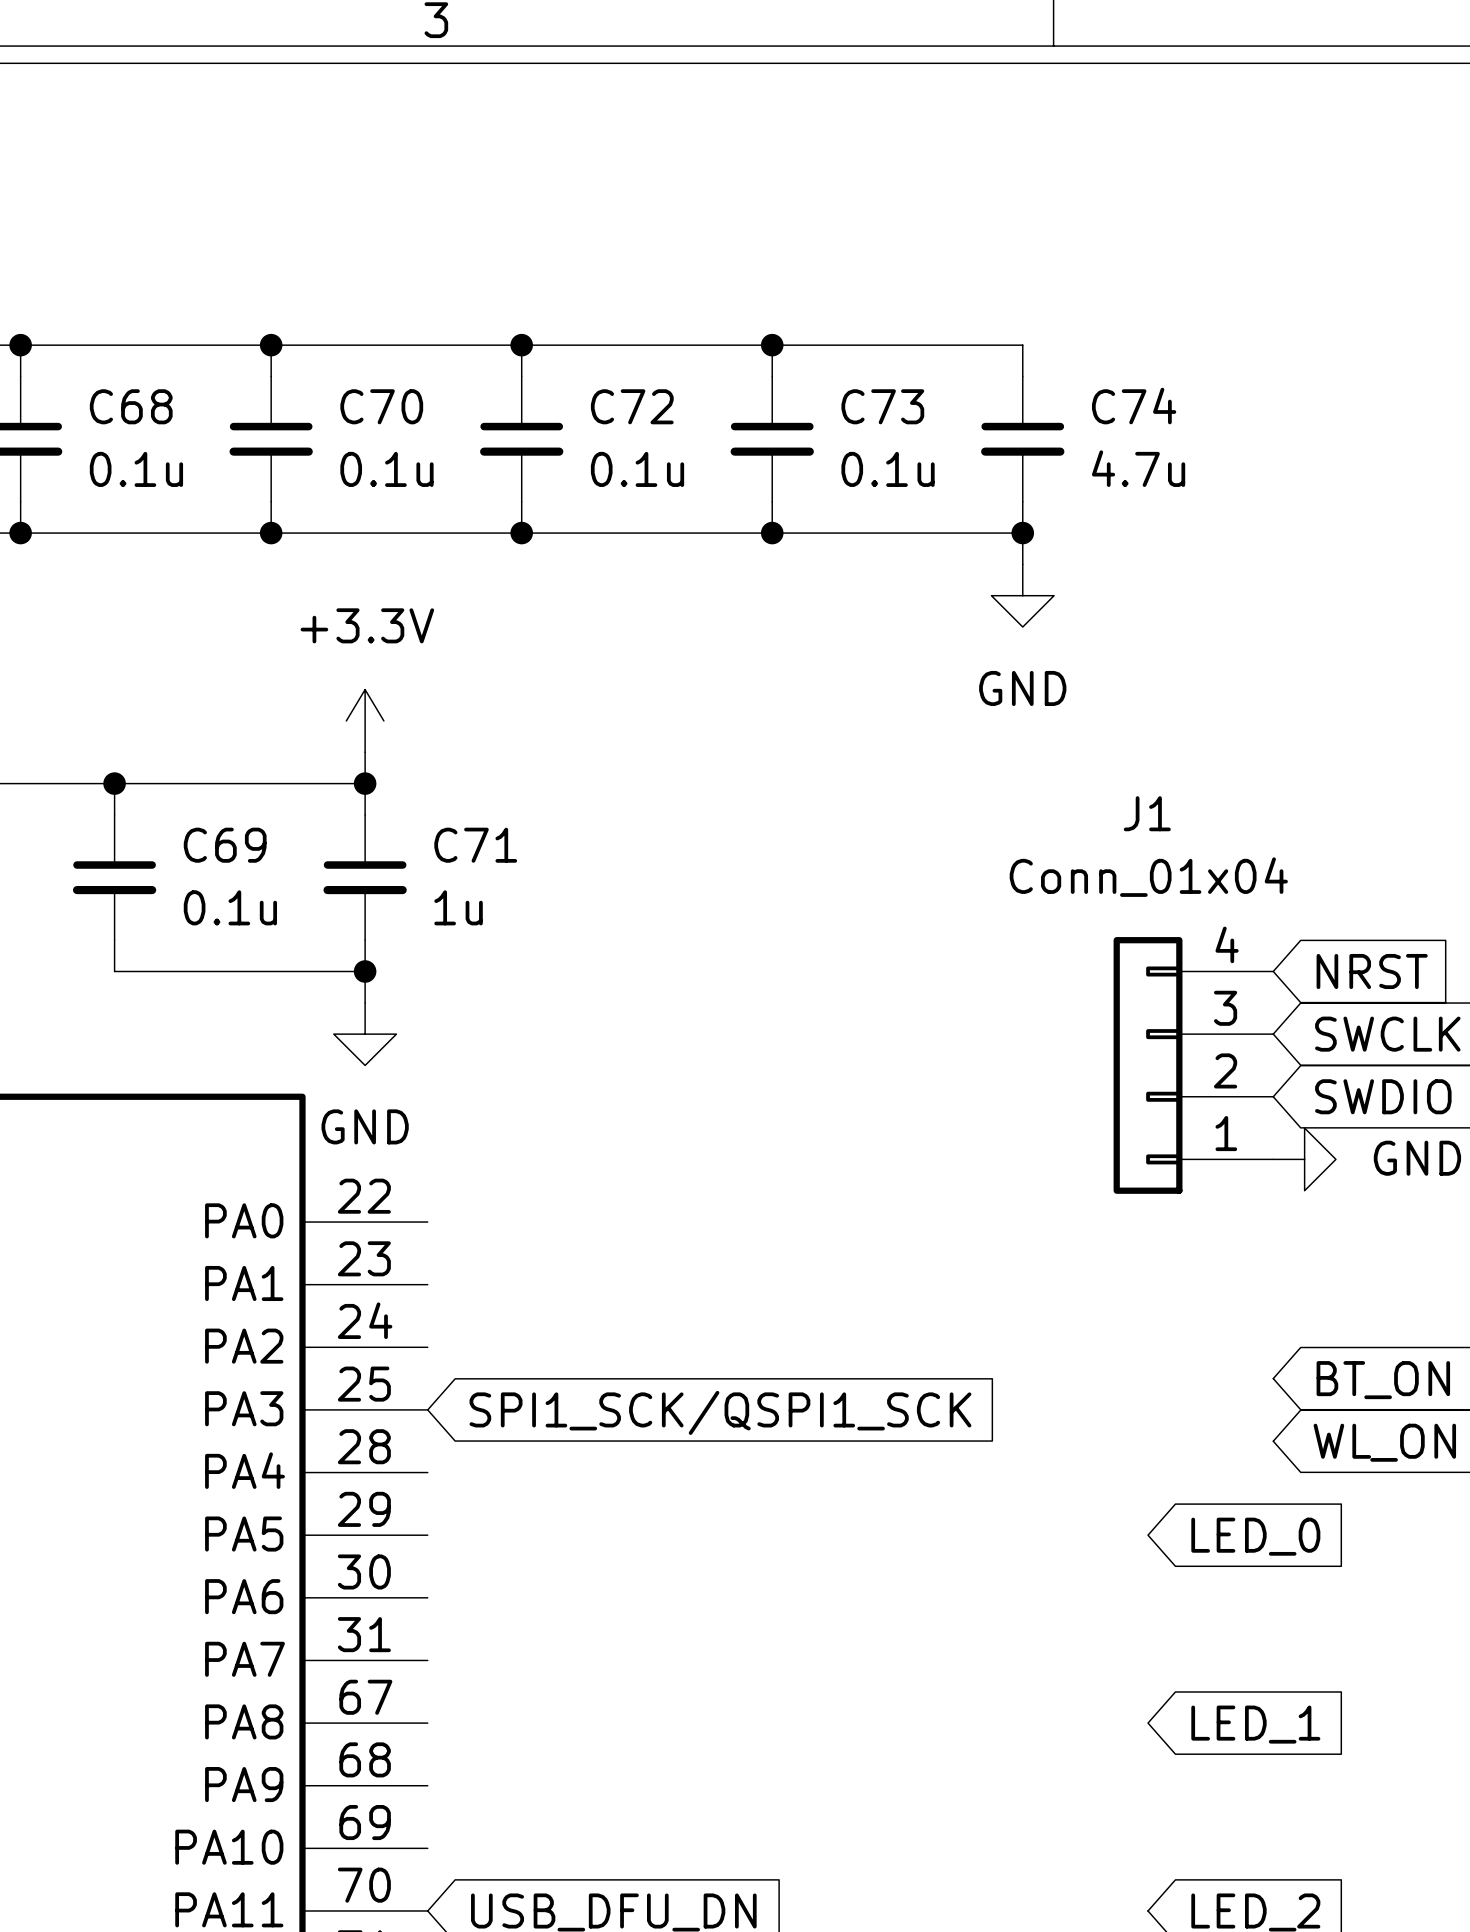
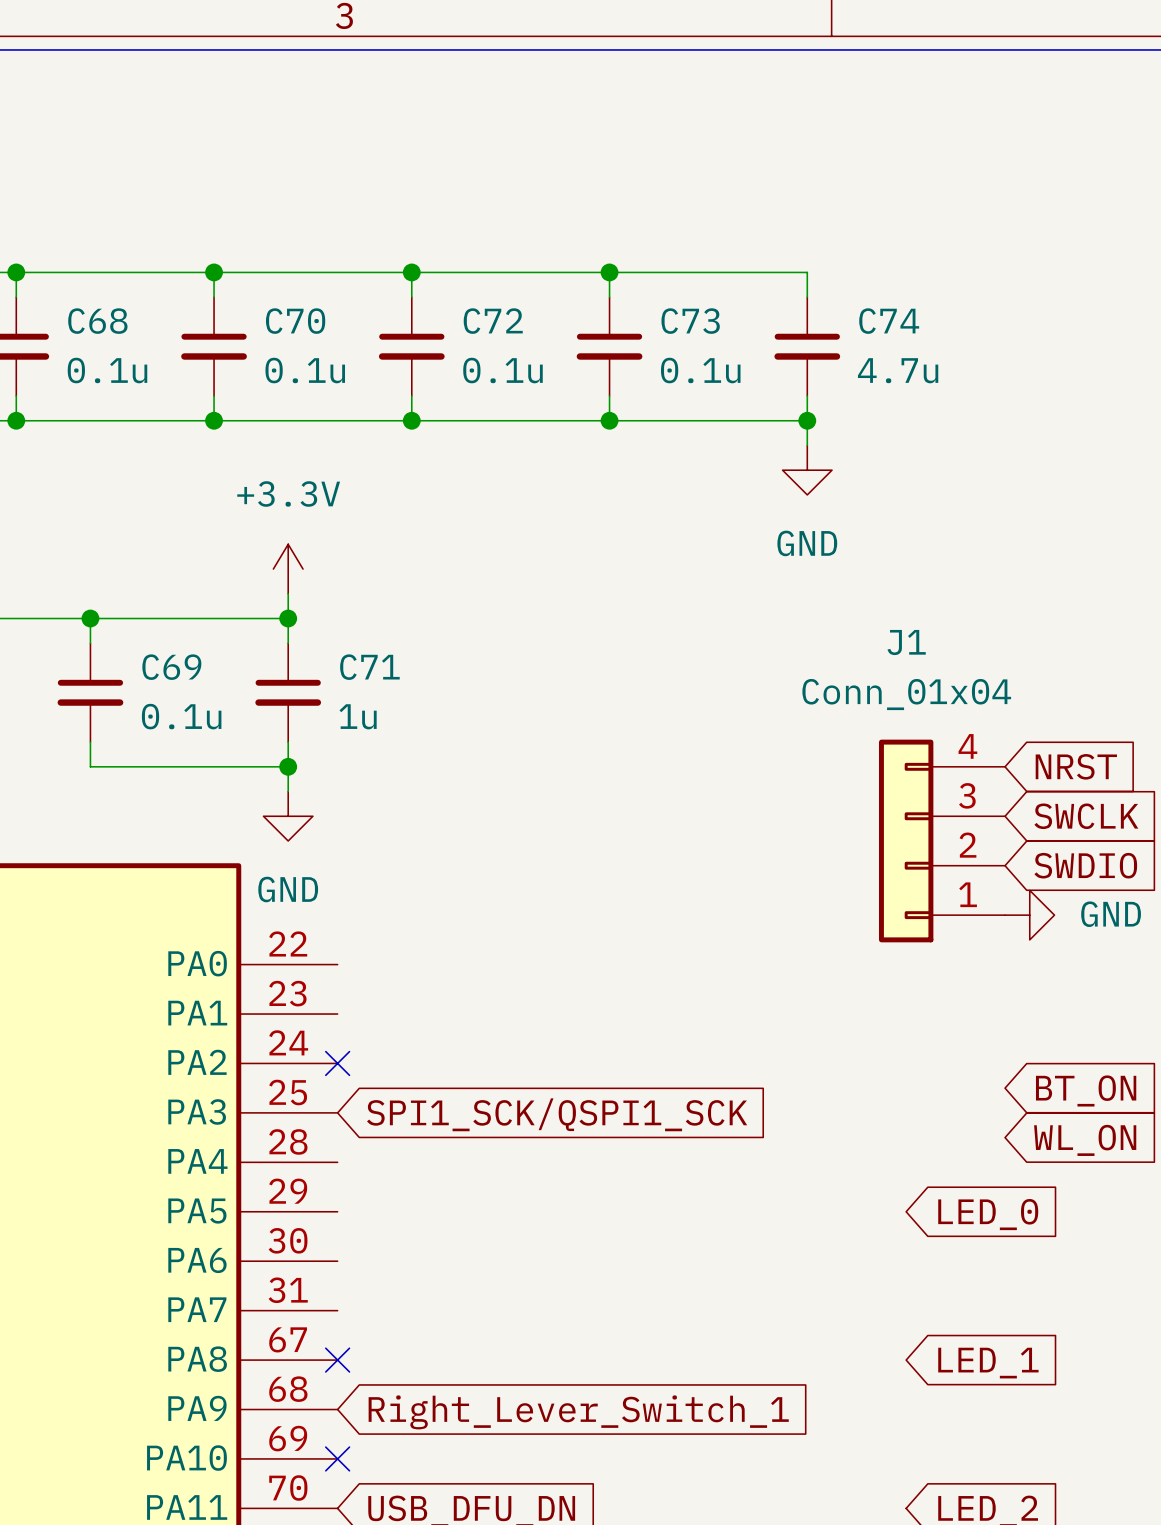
no-connect mark: none -> (337, 1063)
no-connect mark: none -> (337, 1360)
global label: none -> Right_Lever_Switch_1 (578, 1412)
no-connect mark: none -> (337, 1458)

